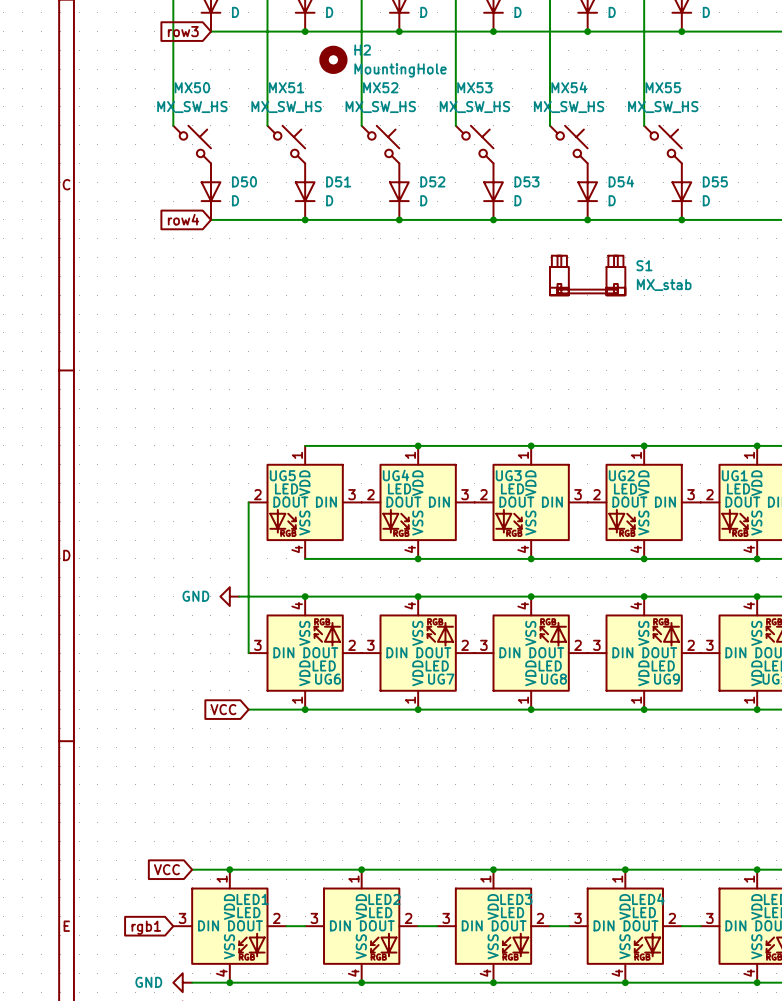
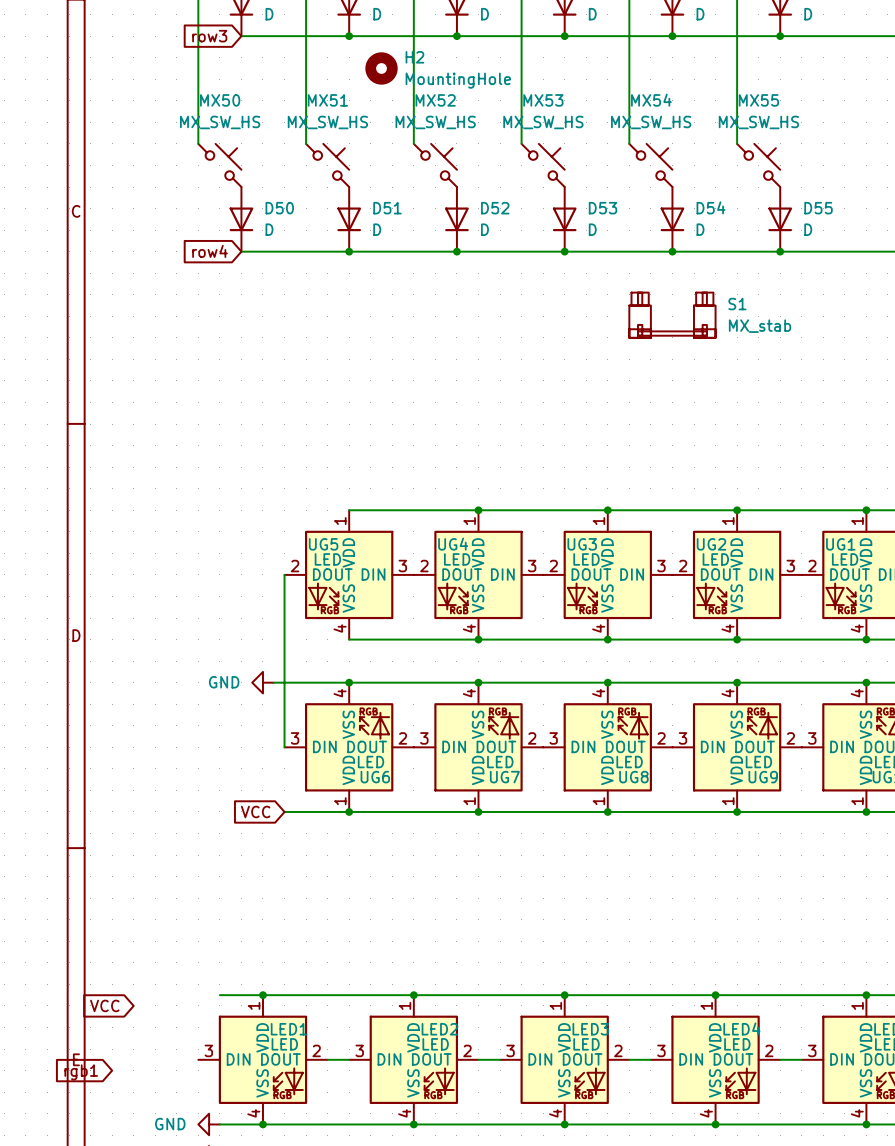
global label position: VCC (166, 869) -> VCC (104, 1005)
global label position: rgb1 (146, 927) -> rgb1 (81, 1072)

